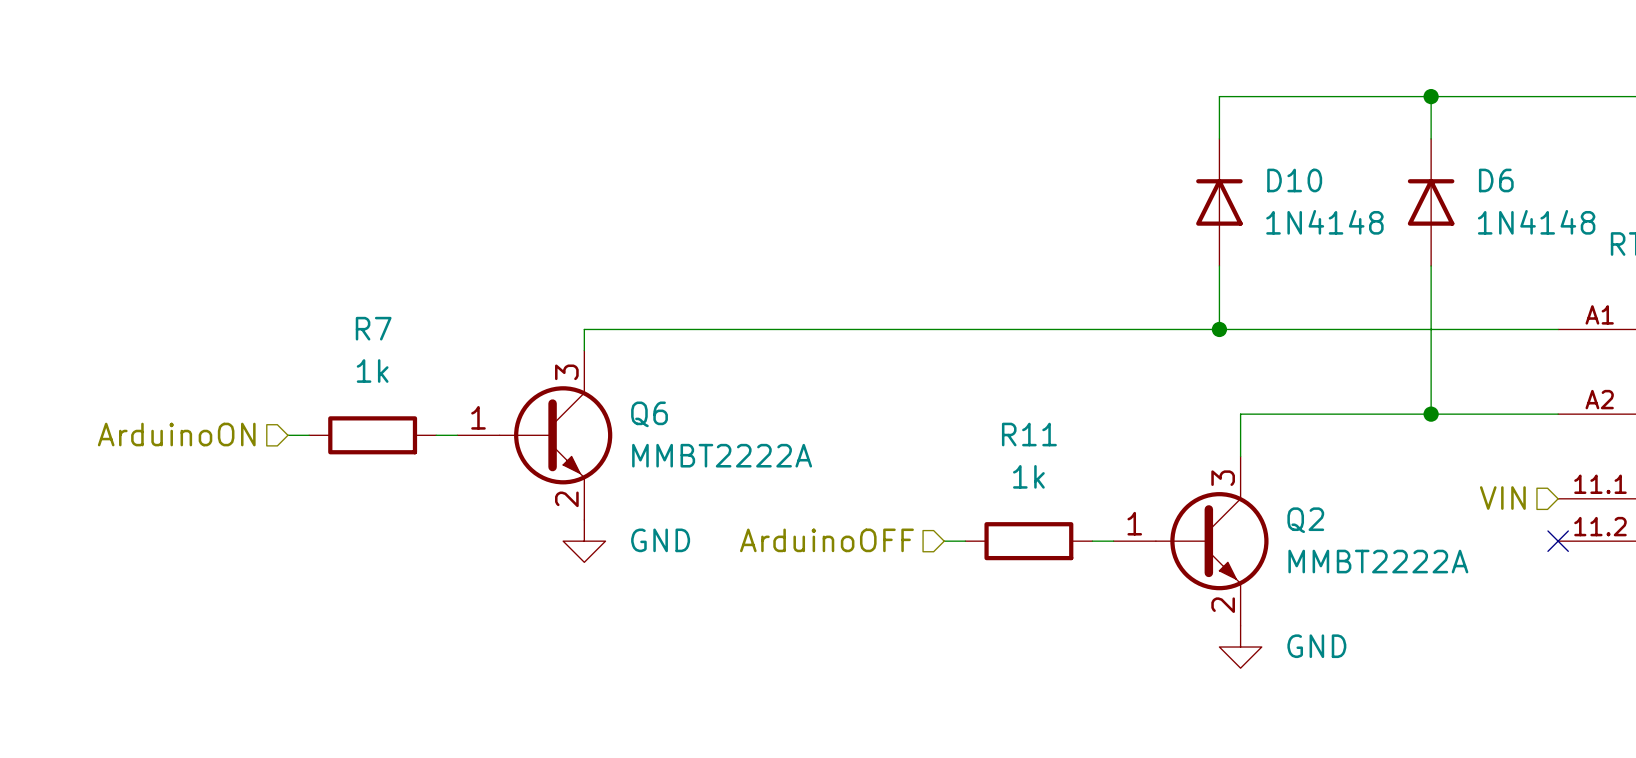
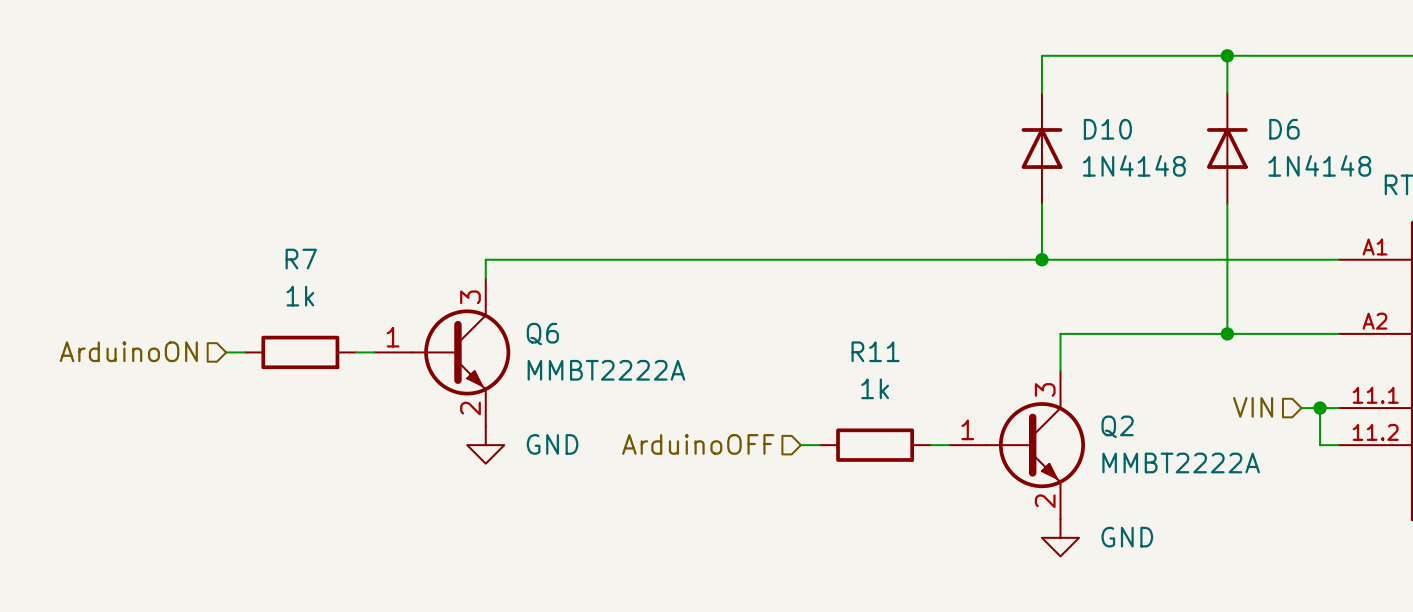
hierarchical label position: VIN (1502, 498) -> VIN (1253, 407)
wire: none -> (1301, 408) (1338, 408)
wire: none -> (1320, 408) (1320, 445) (1338, 445)
junction: none -> (1320, 408)
no-connect mark: (1558, 541) -> none

